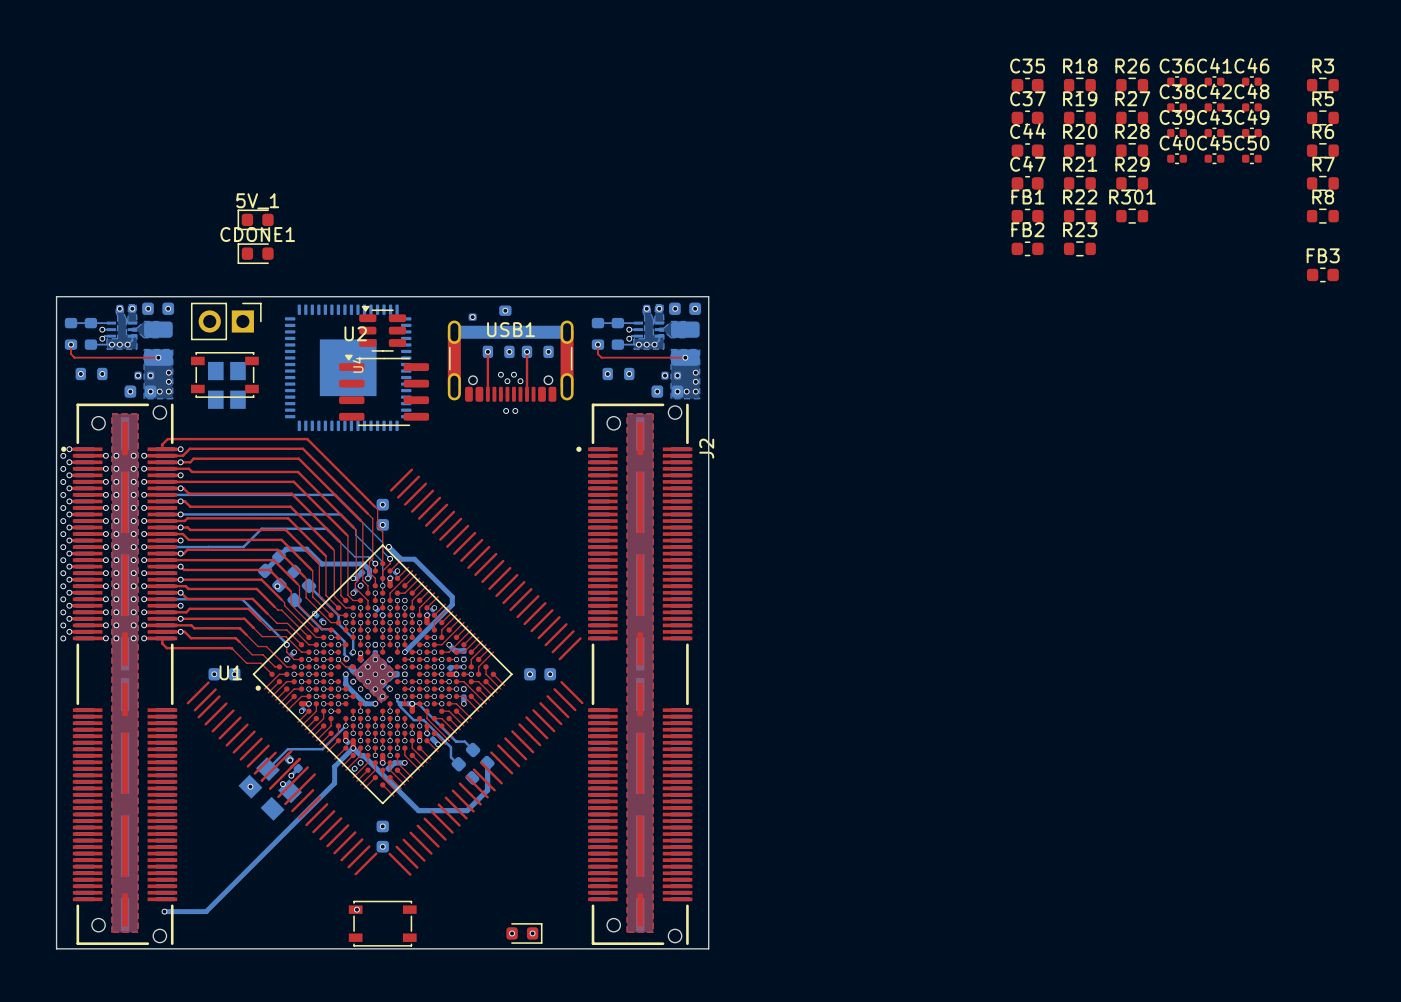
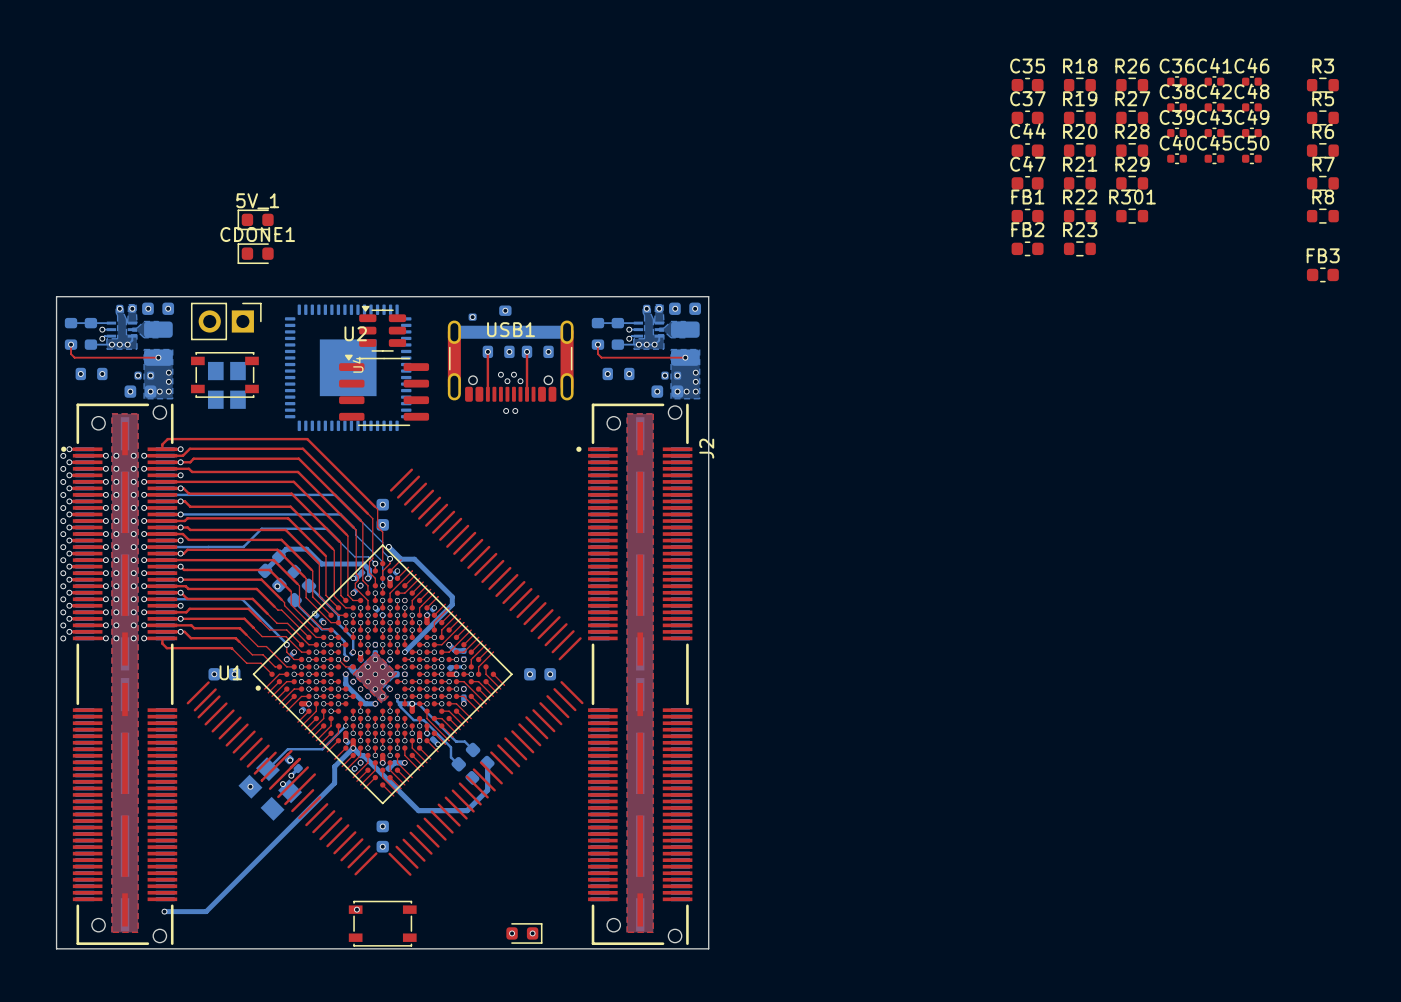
via: none -> (390, 652)

